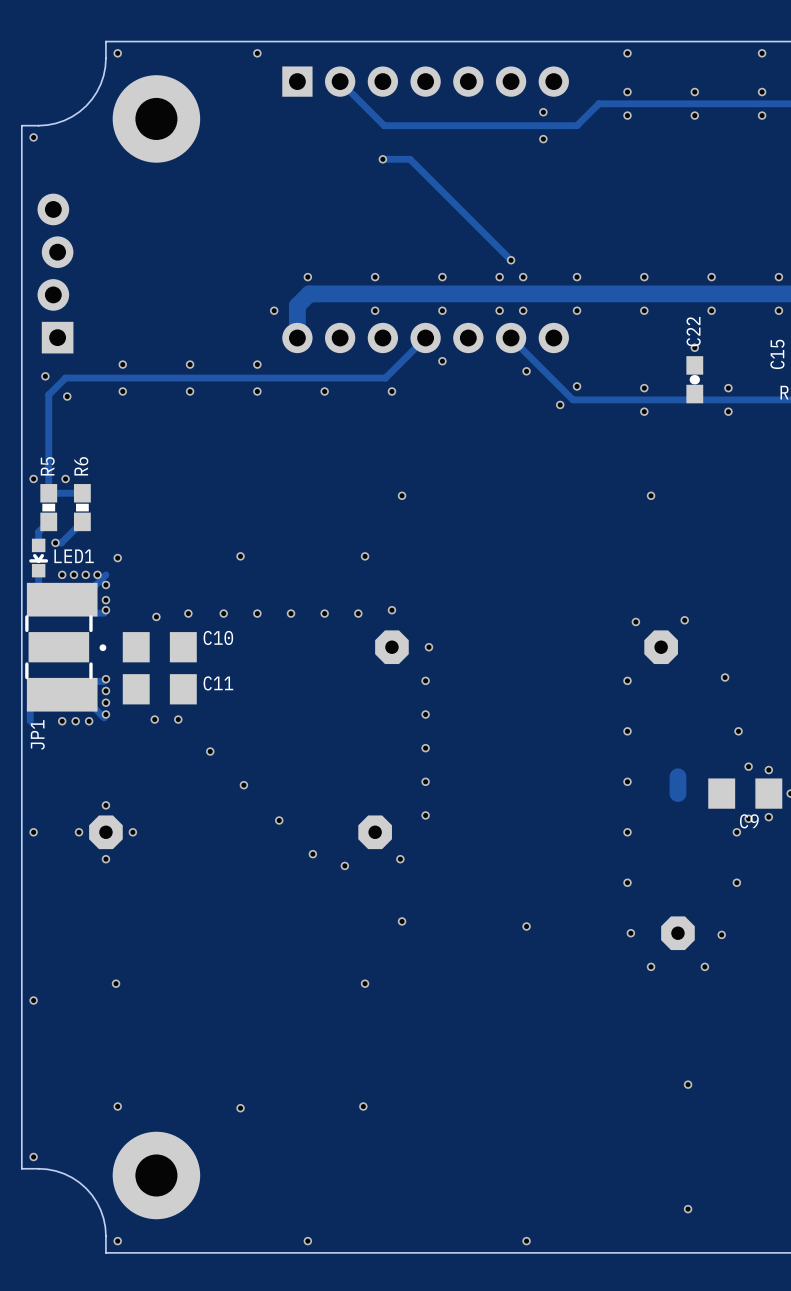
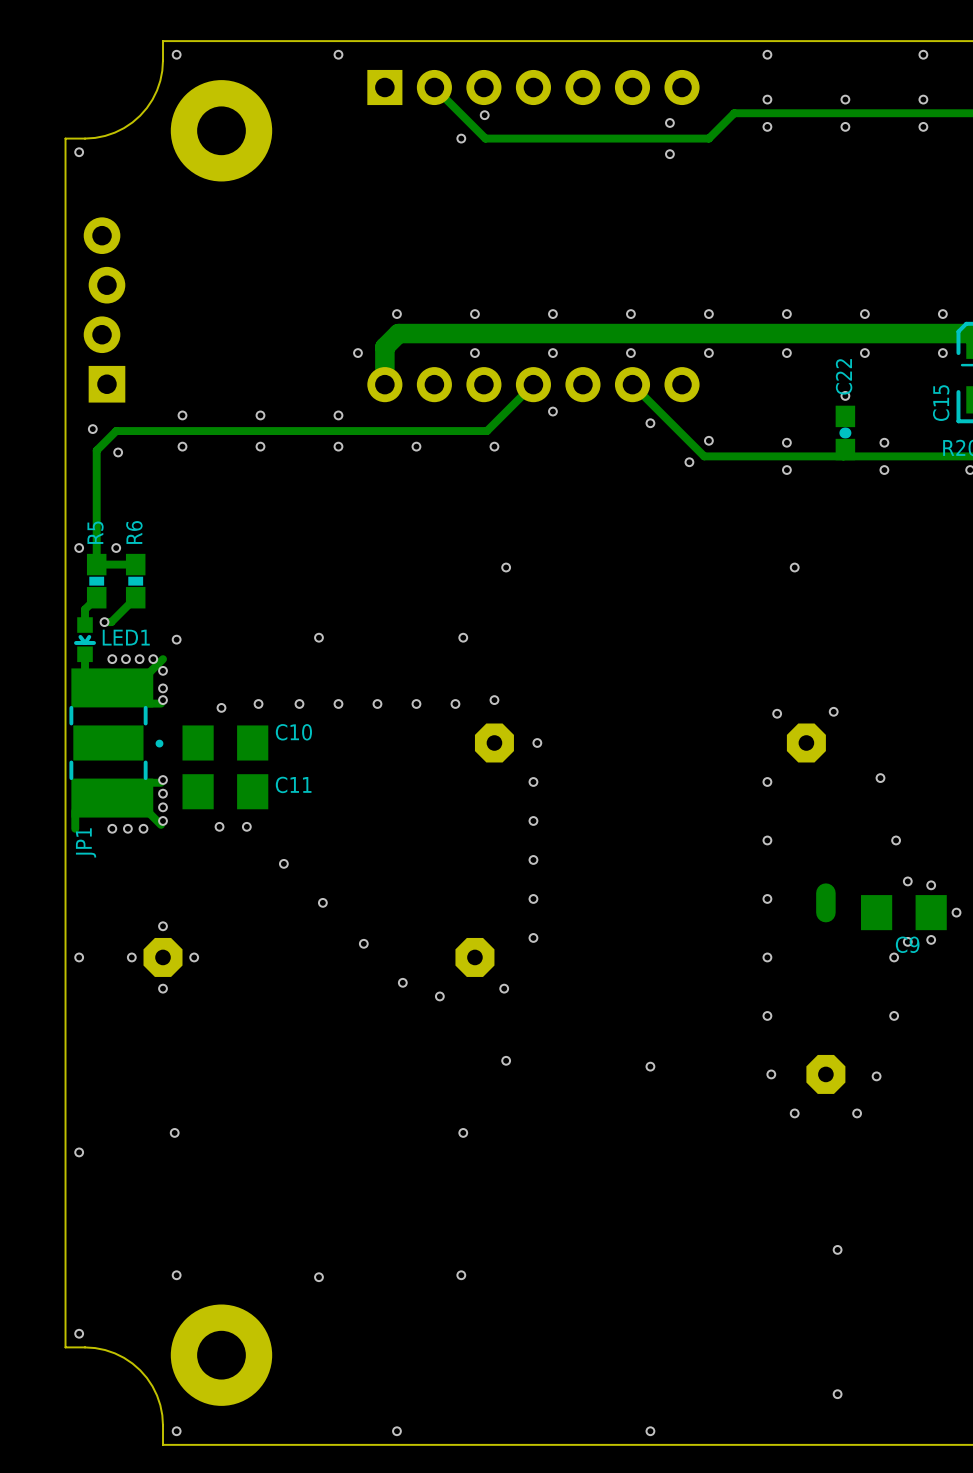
via: none -> (484, 115)
via: none -> (461, 138)
track: (382, 159) (410, 159) (511, 260) -> none
via: (382, 159) -> none
via: (511, 260) -> none
via: (499, 277) -> none
via: none -> (630, 314)
via: (523, 277) -> none
via: (499, 310) -> none
via: none -> (630, 353)
via: (523, 310) -> none

